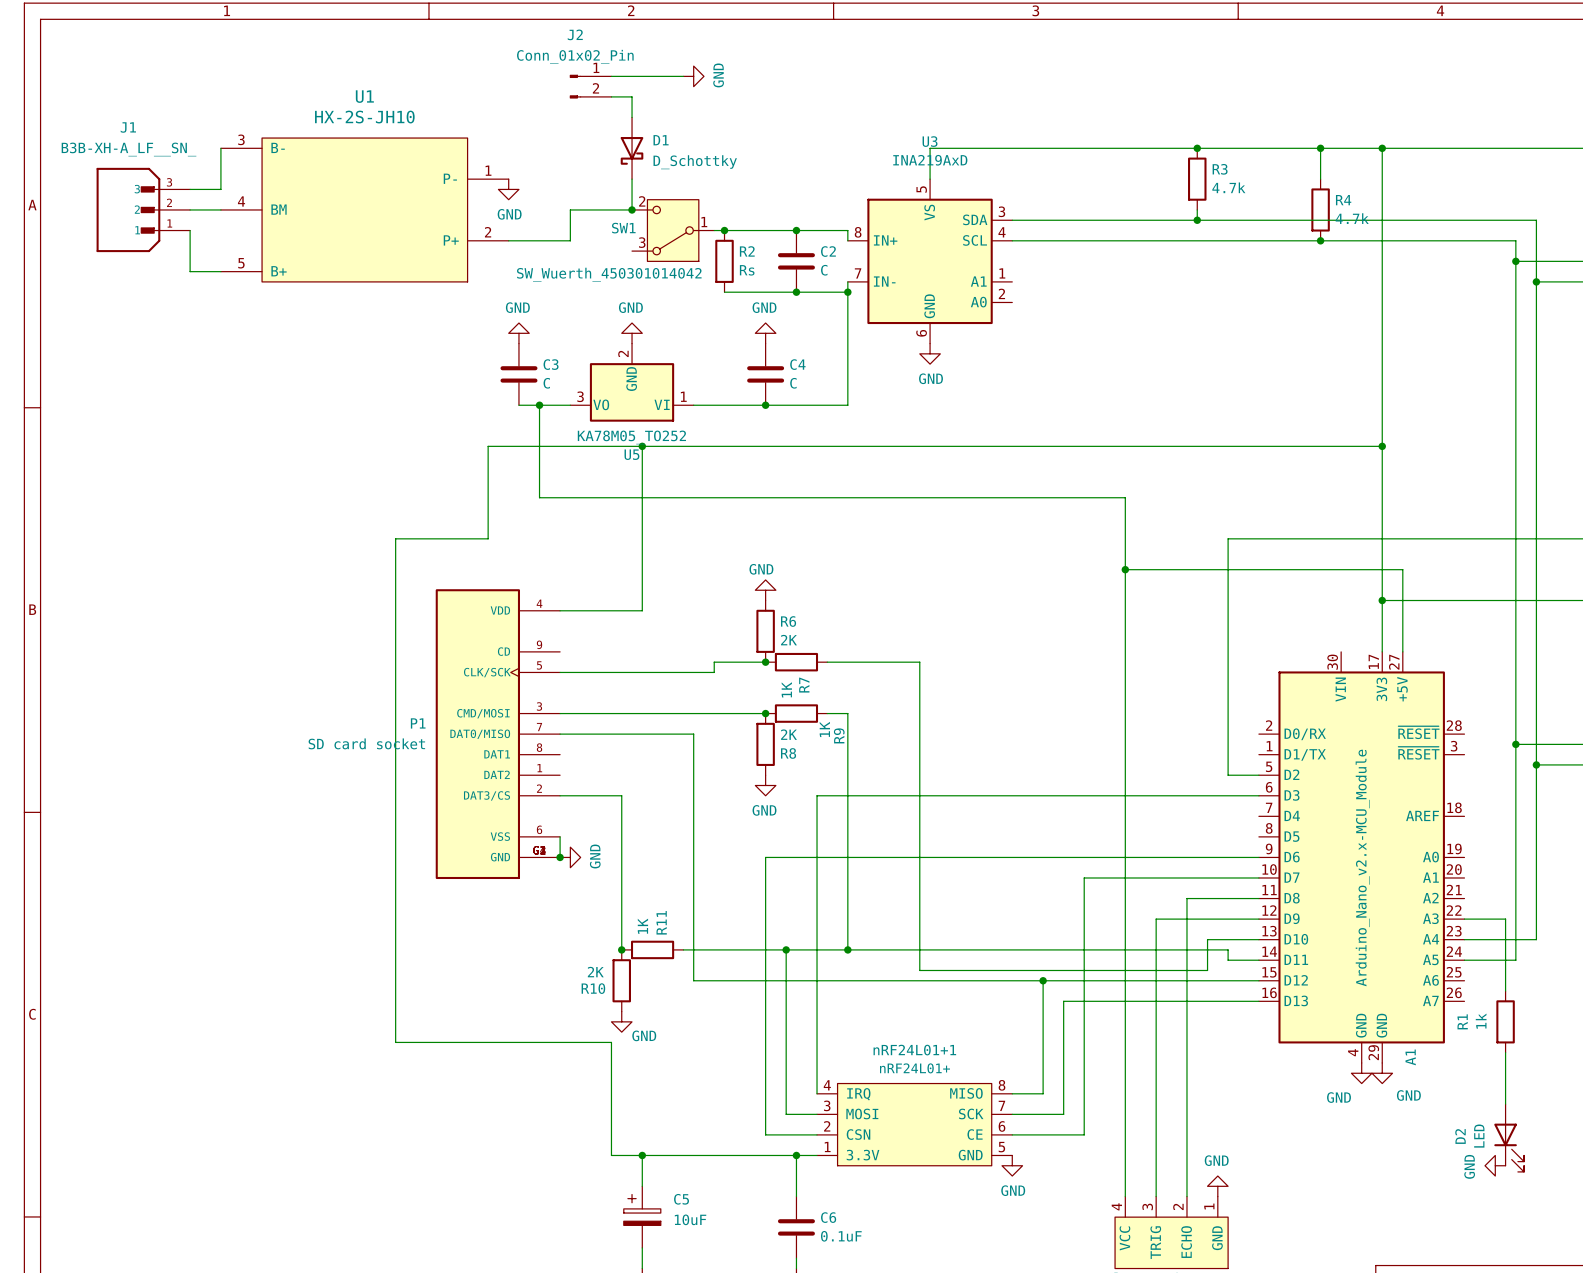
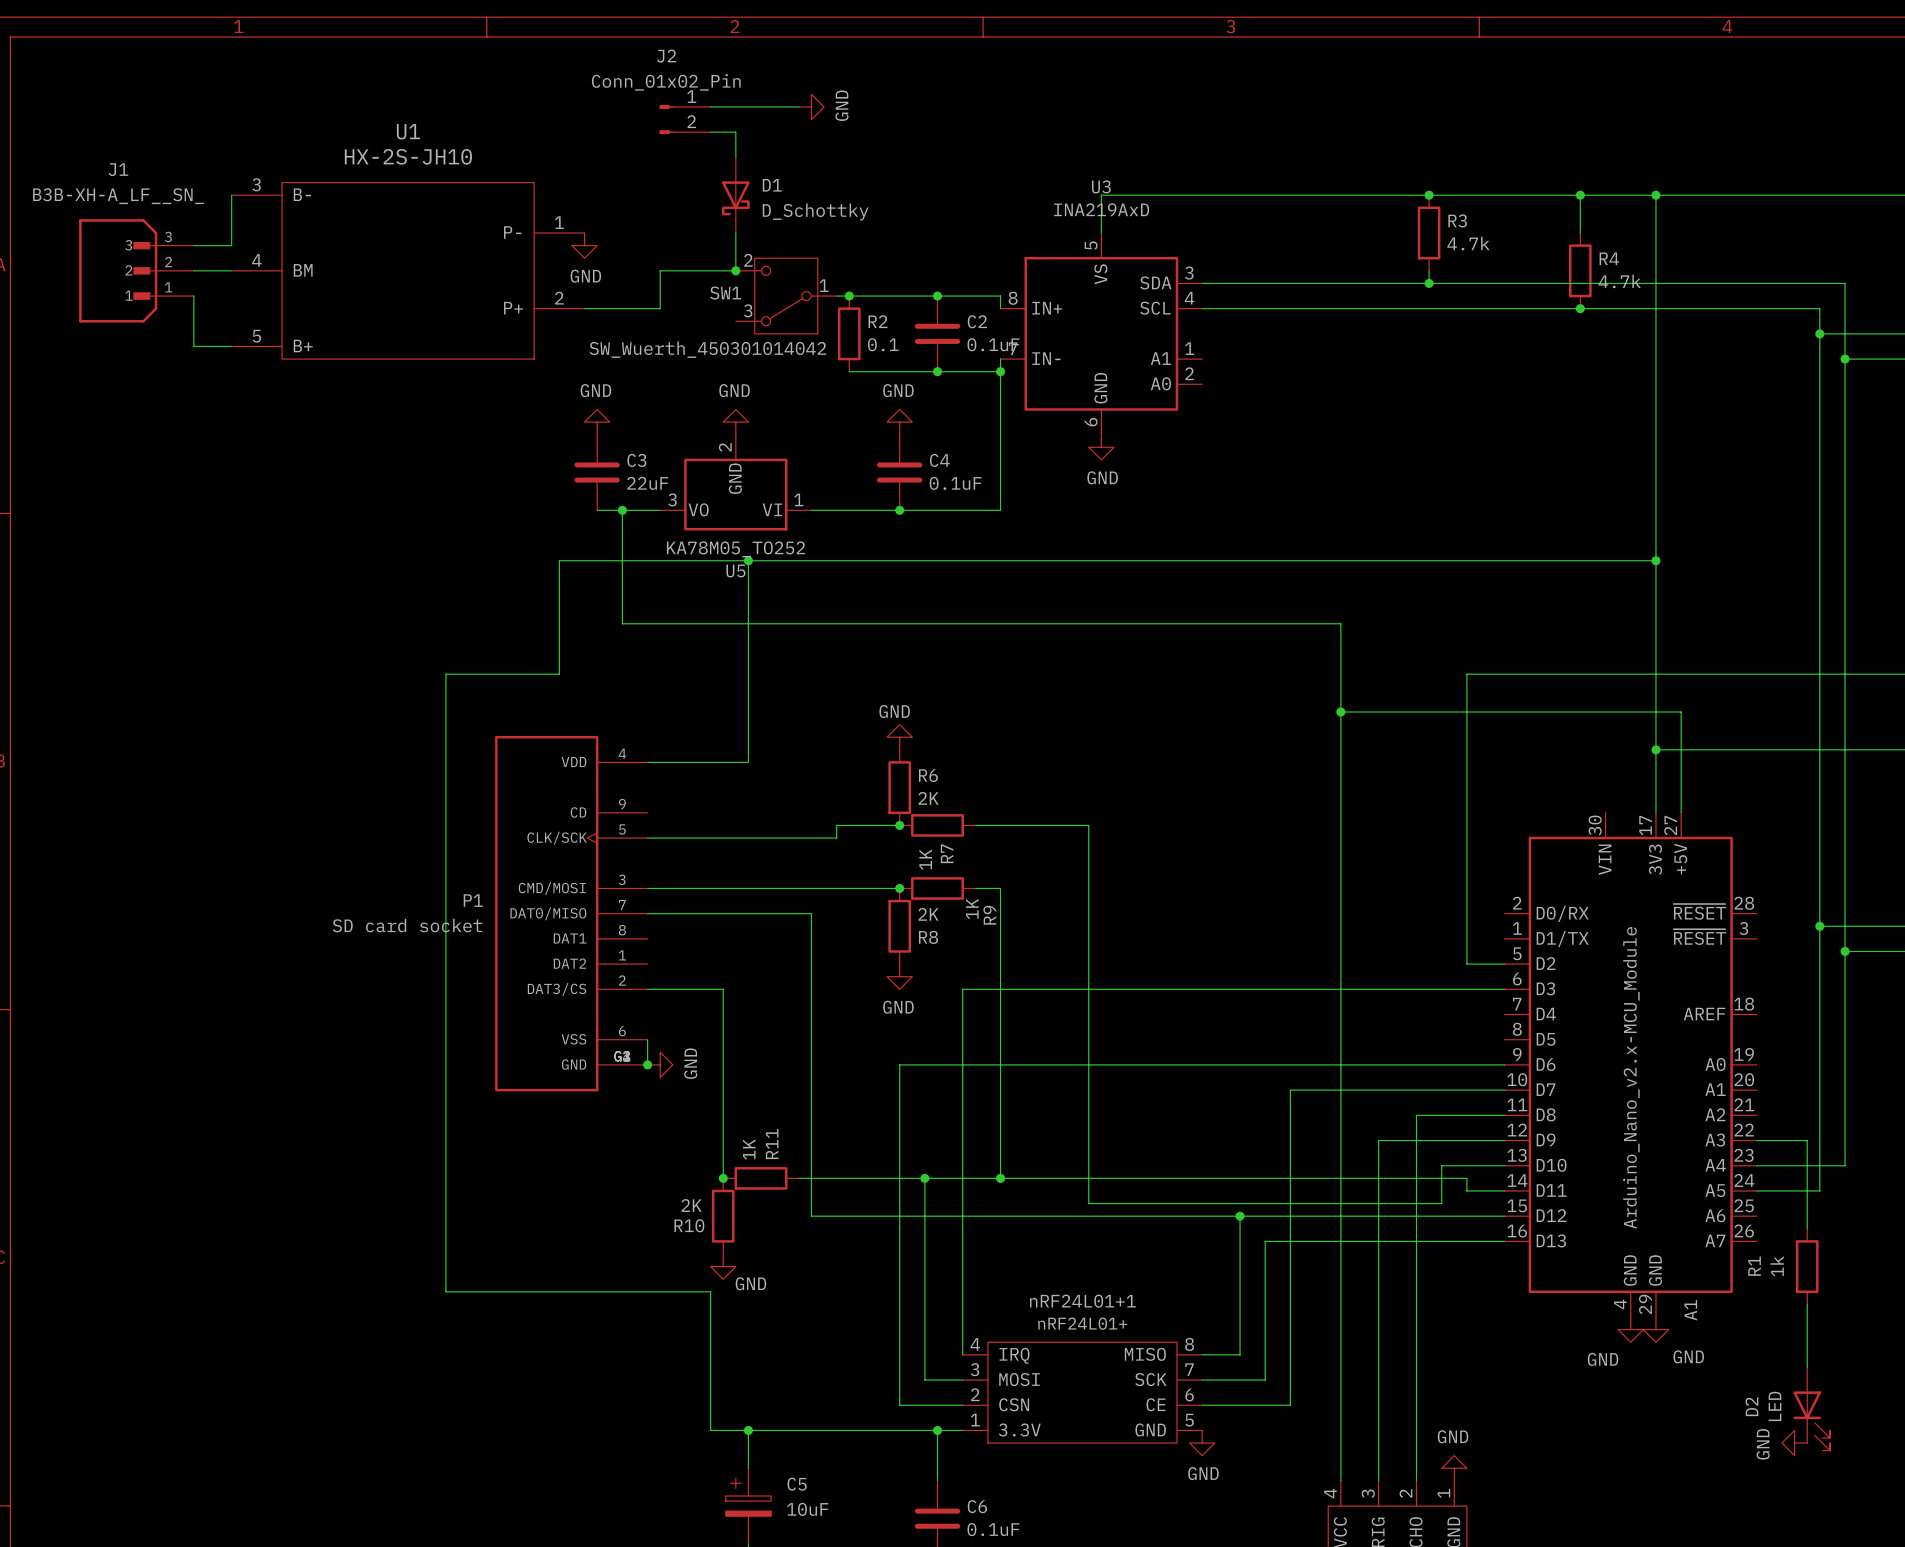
R2 value: Rs (747, 270) -> 0.1 (883, 344)
C2 value: C (824, 270) -> 0.1uF (993, 344)
C3 value: C (546, 383) -> 22uF (647, 483)
C4 value: C (793, 383) -> 0.1uF (955, 483)

